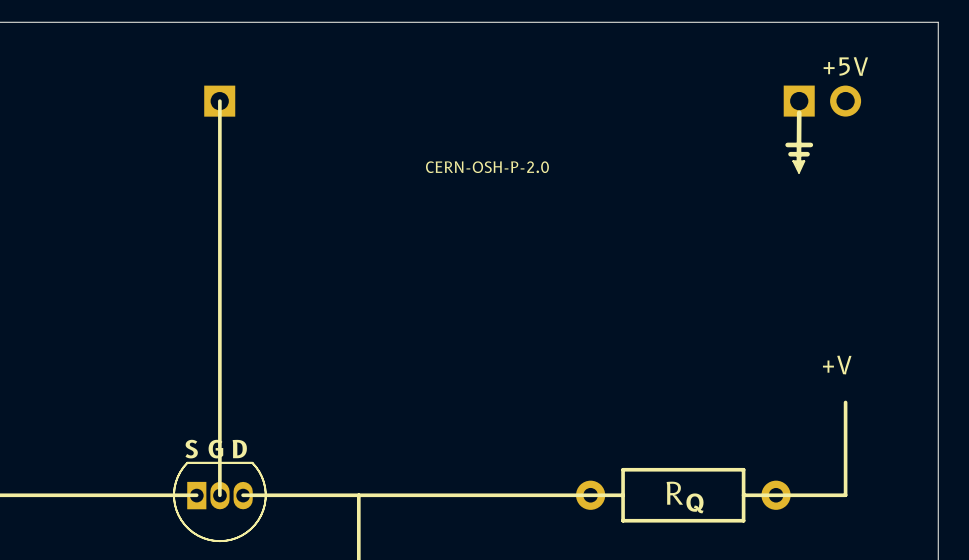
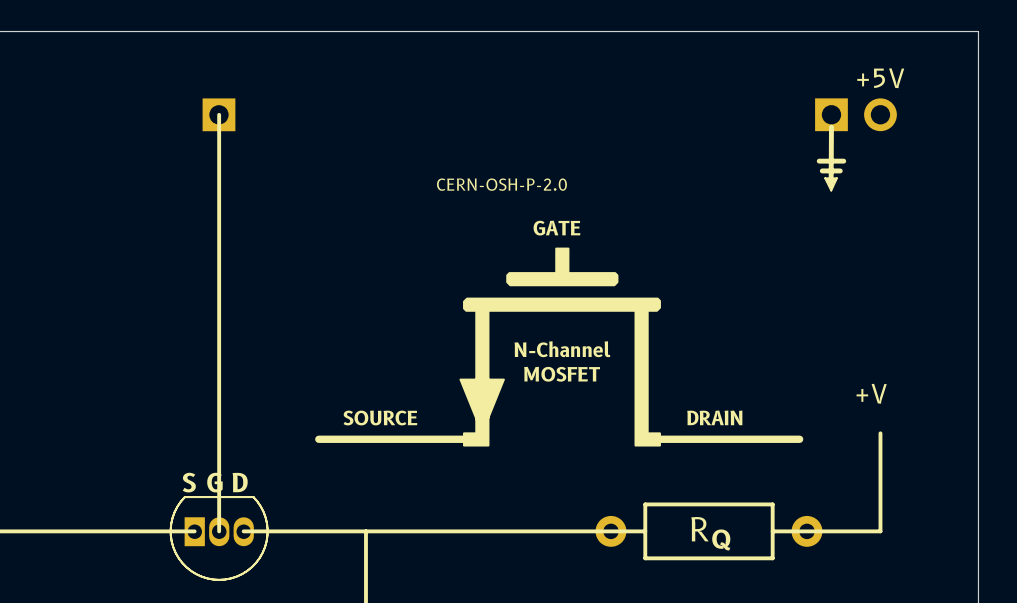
text: none -> GATE (556, 228)
drawing: none -> [459, 247, 661, 447]
text: none -> N-Channel (562, 349)
text: none -> MOSFET (562, 374)
text: none -> SOURCE (380, 417)
text: none -> DRAIN (714, 417)
line: none -> (478, 439) (318, 439)
line: none -> (799, 439) (646, 439)

